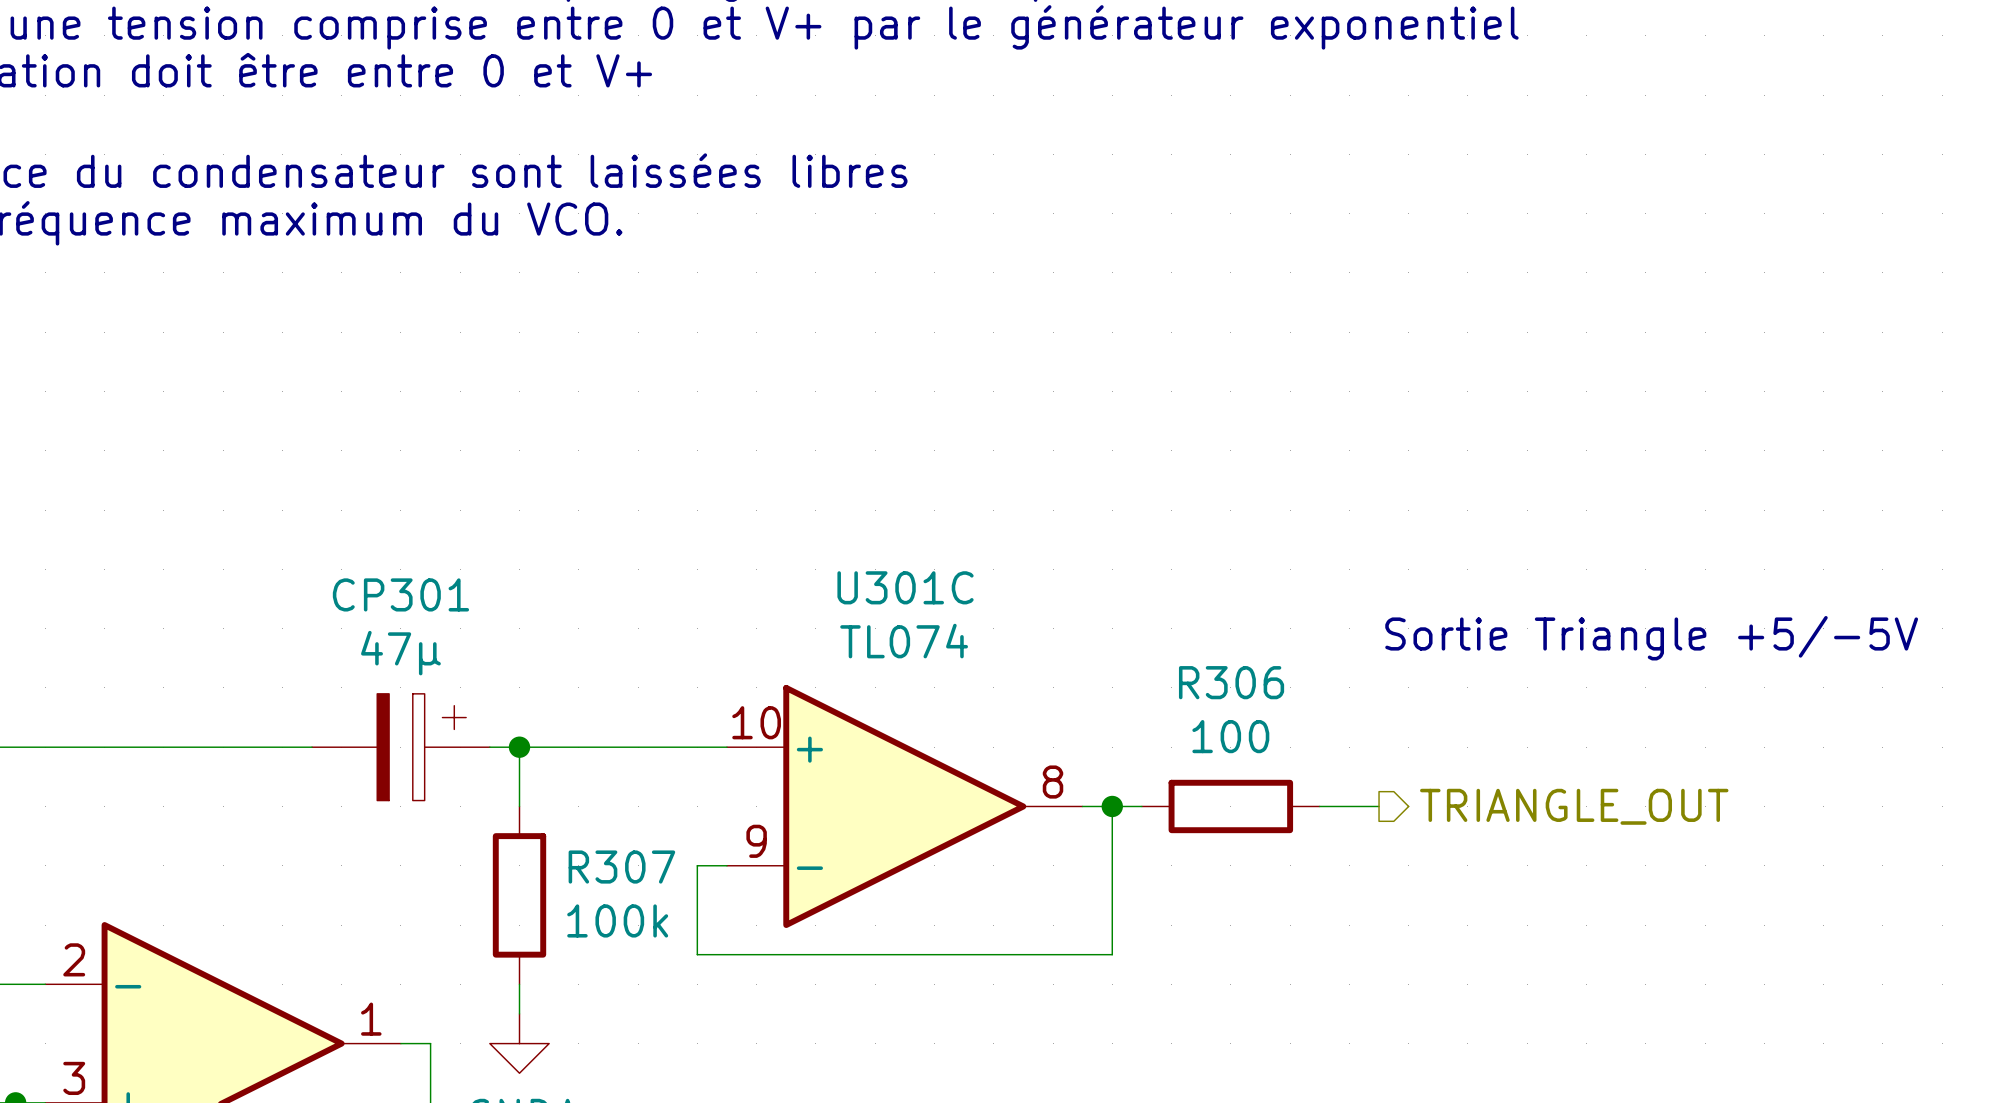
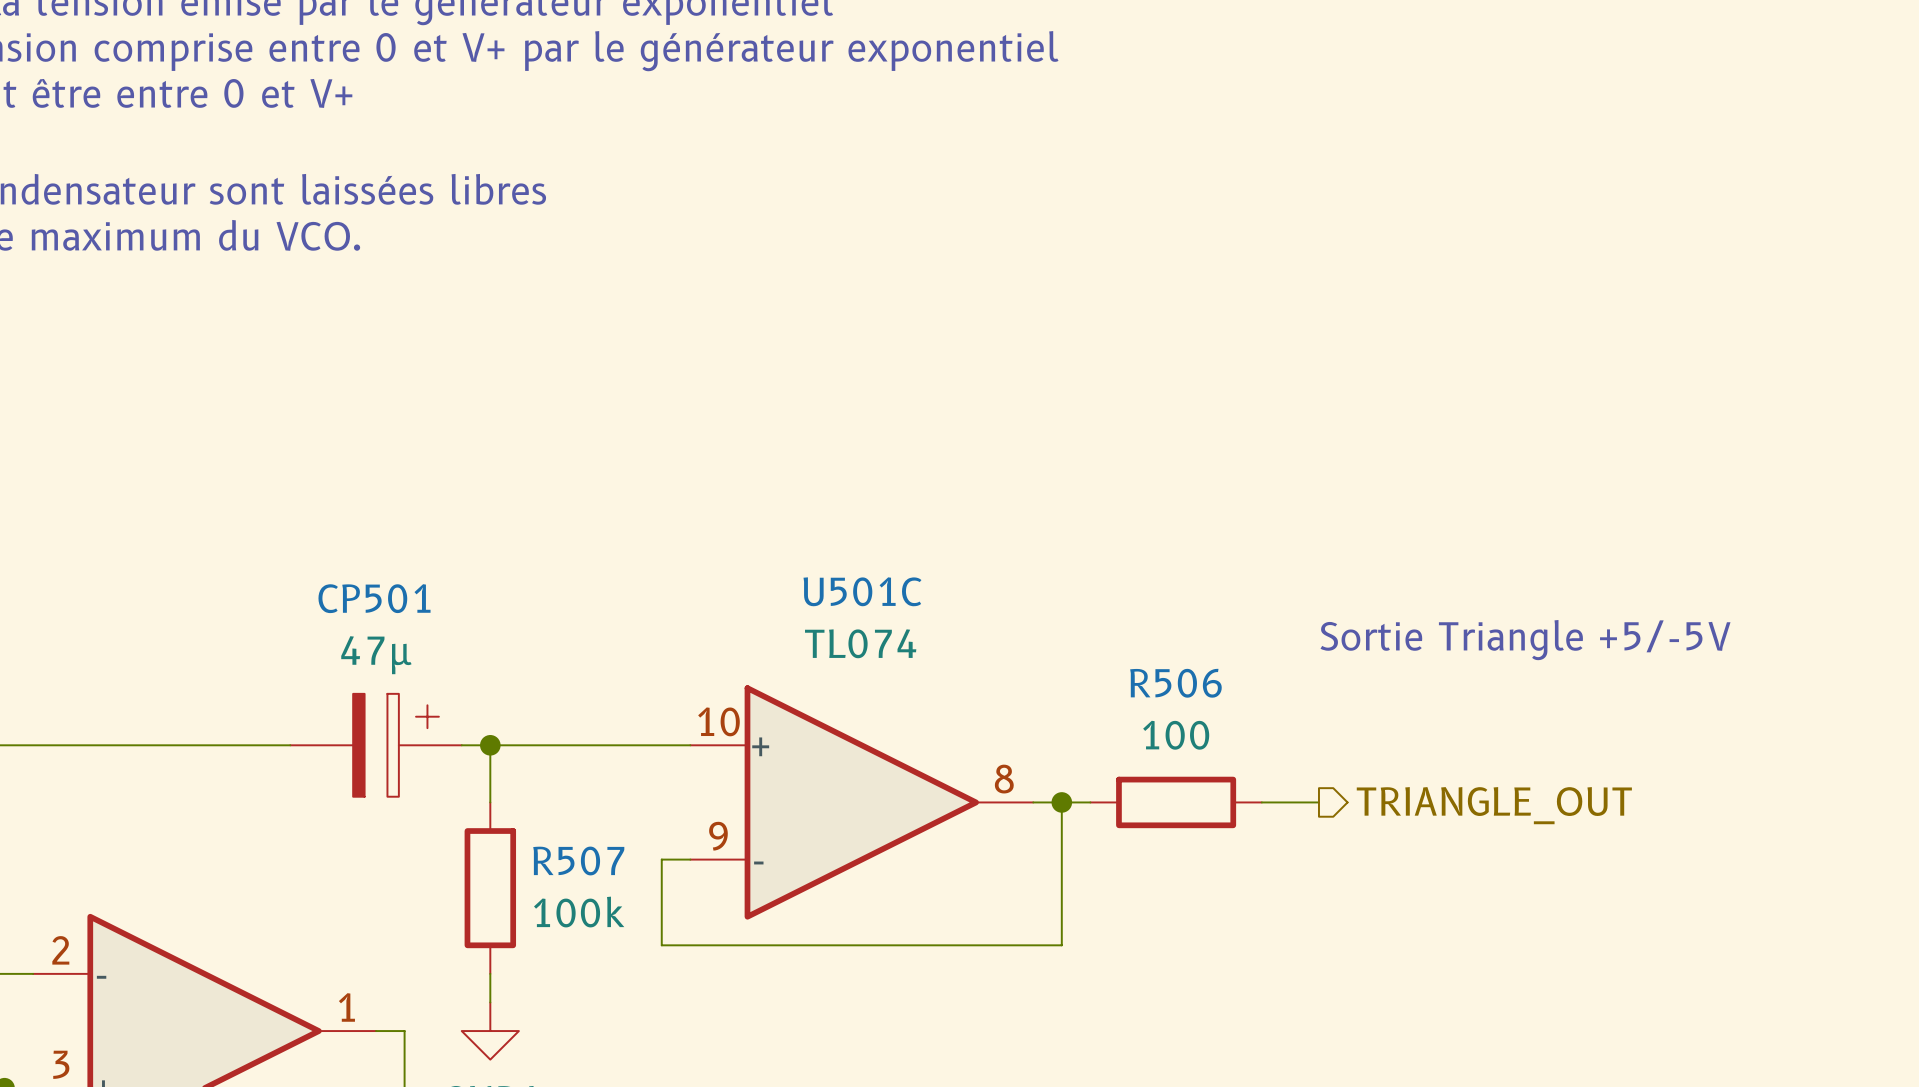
U301C name: U301C (905, 587) -> U501C (862, 591)
CP301 name: CP301 (400, 594) -> CP501 (374, 598)
R306 name: R306 (1231, 682) -> R506 (1175, 683)
R307 name: R307 (621, 867) -> R507 (578, 861)

